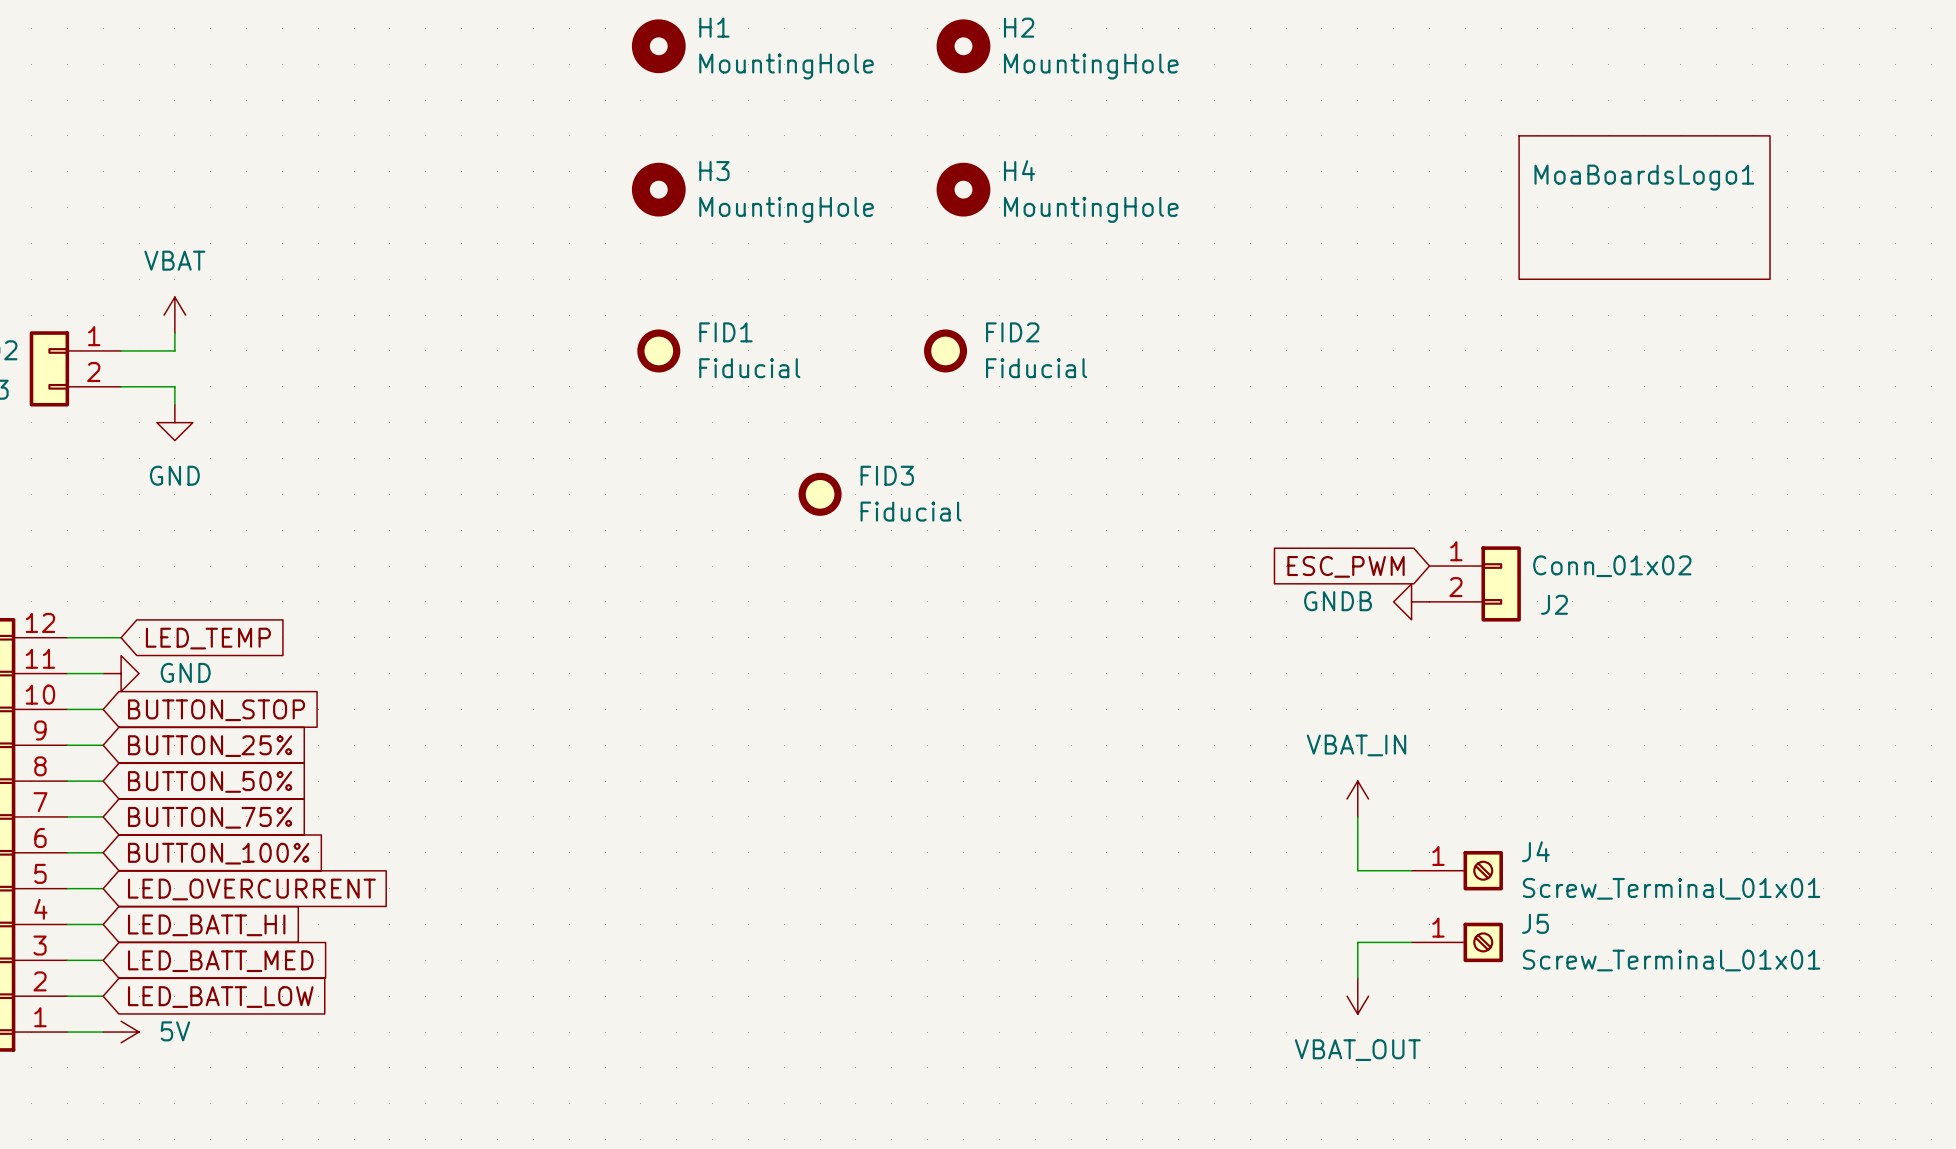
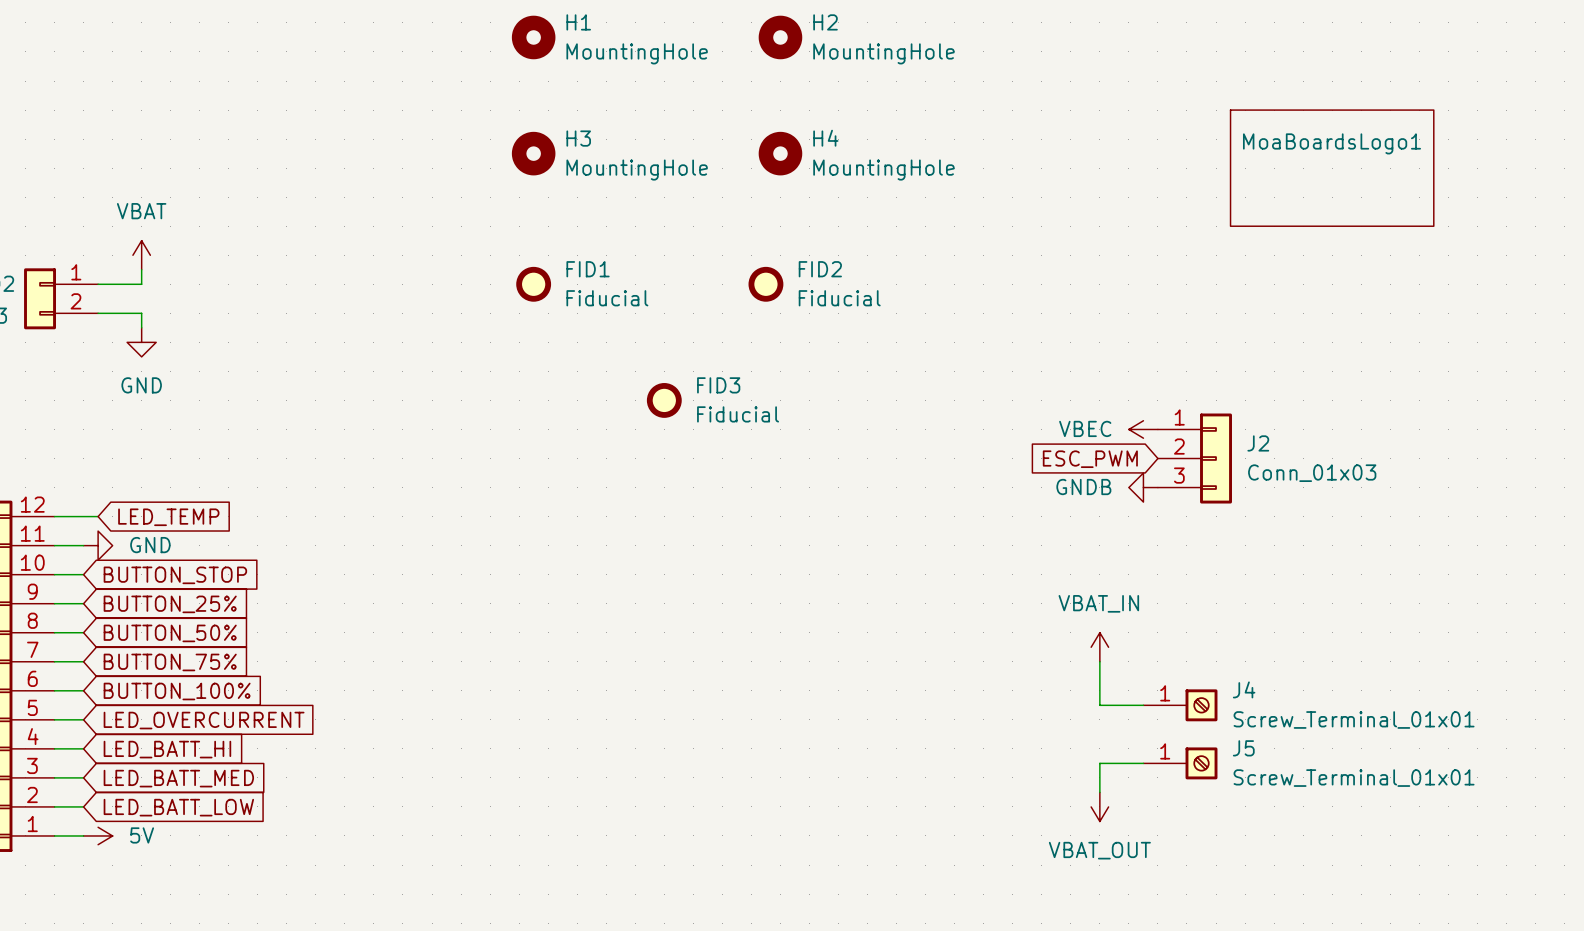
power symbol: none -> VBEC (1143, 429)
J2 symbol: [1429, 546, 1521, 622] -> [1157, 413, 1232, 504]
J2 value: Conn_01x02 (1612, 566) -> Conn_01x03 (1312, 473)
J2 name position: J2 (1554, 604) -> J2 (1258, 443)

